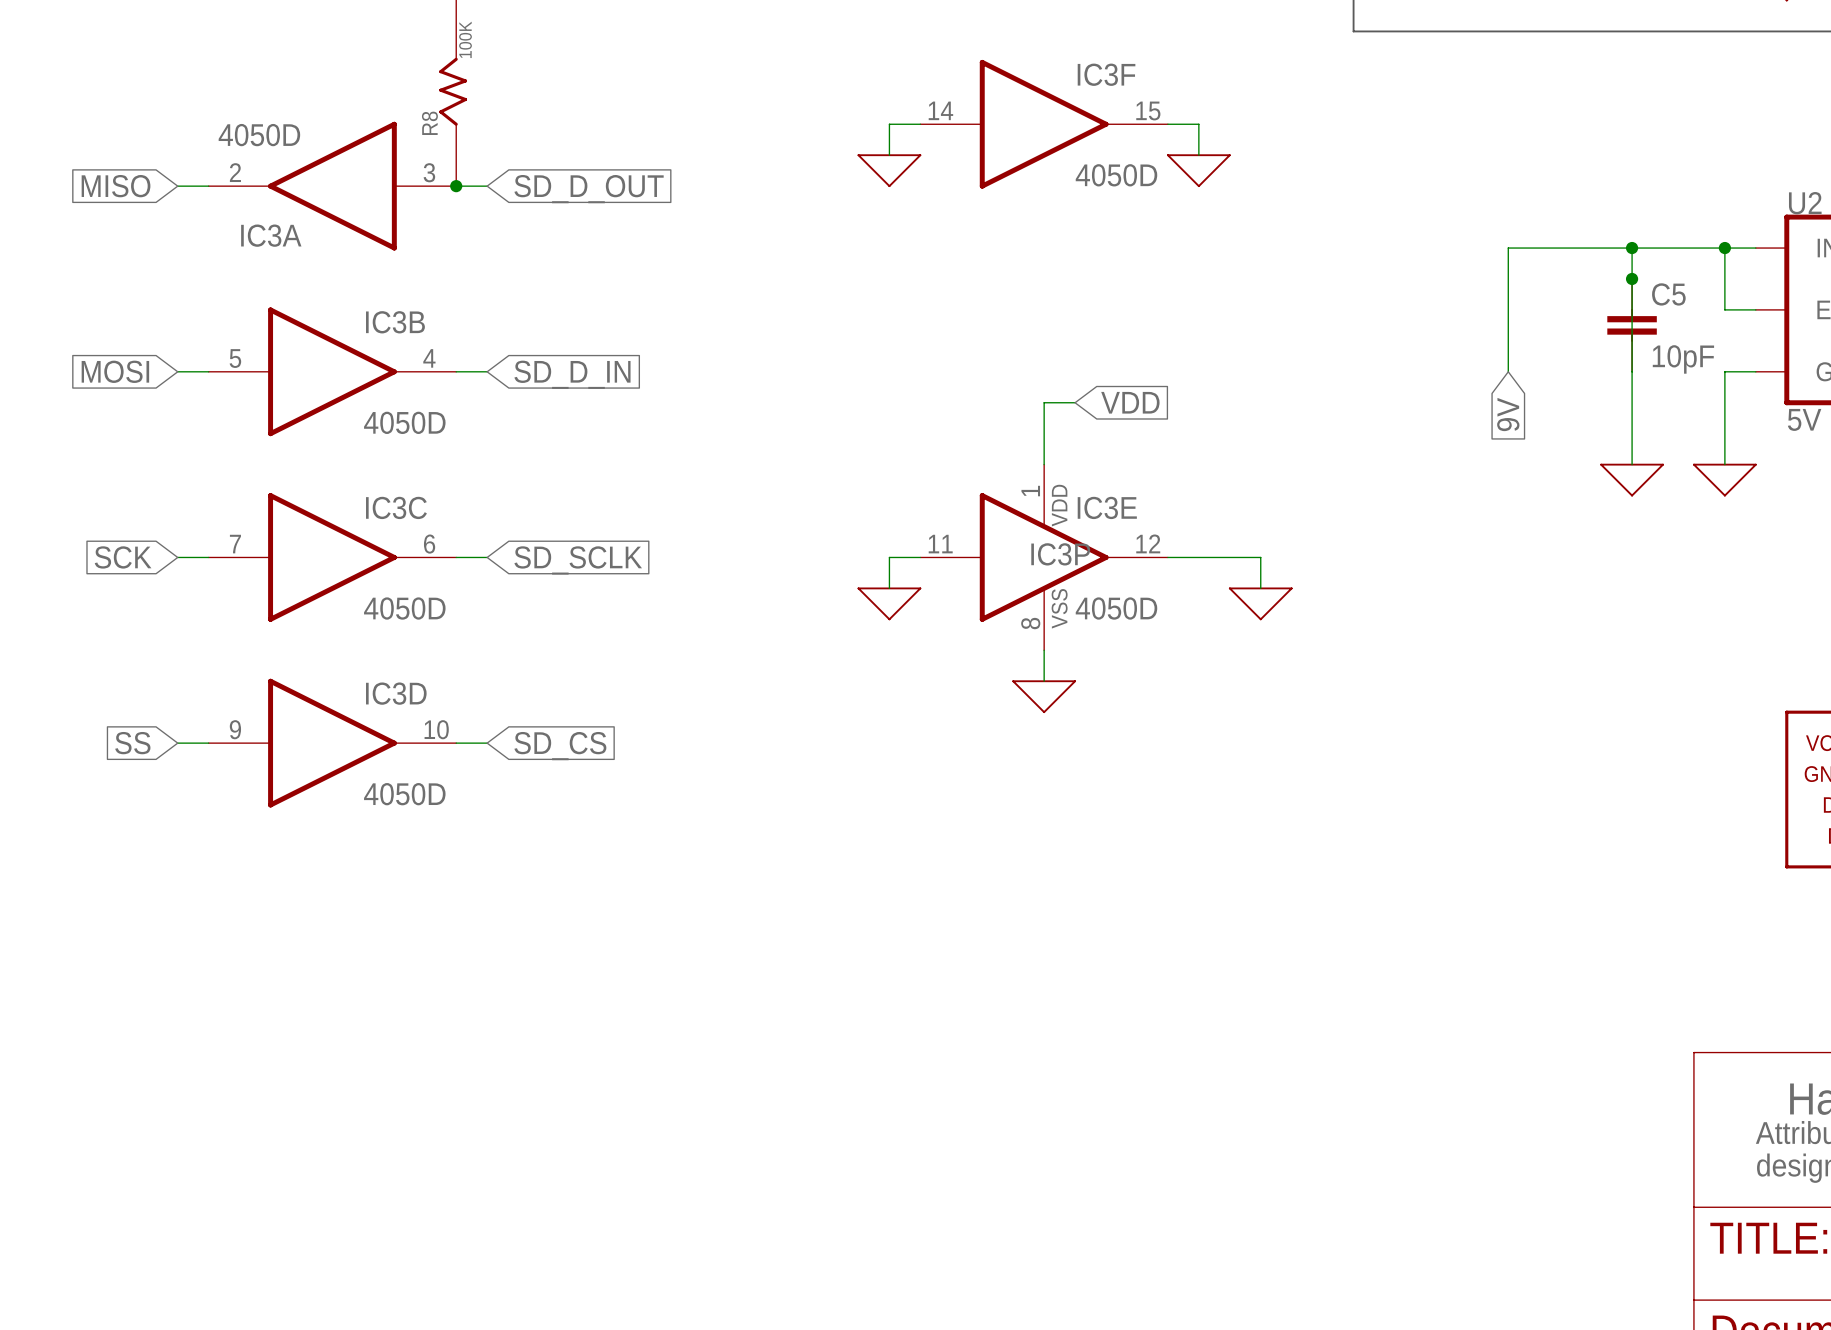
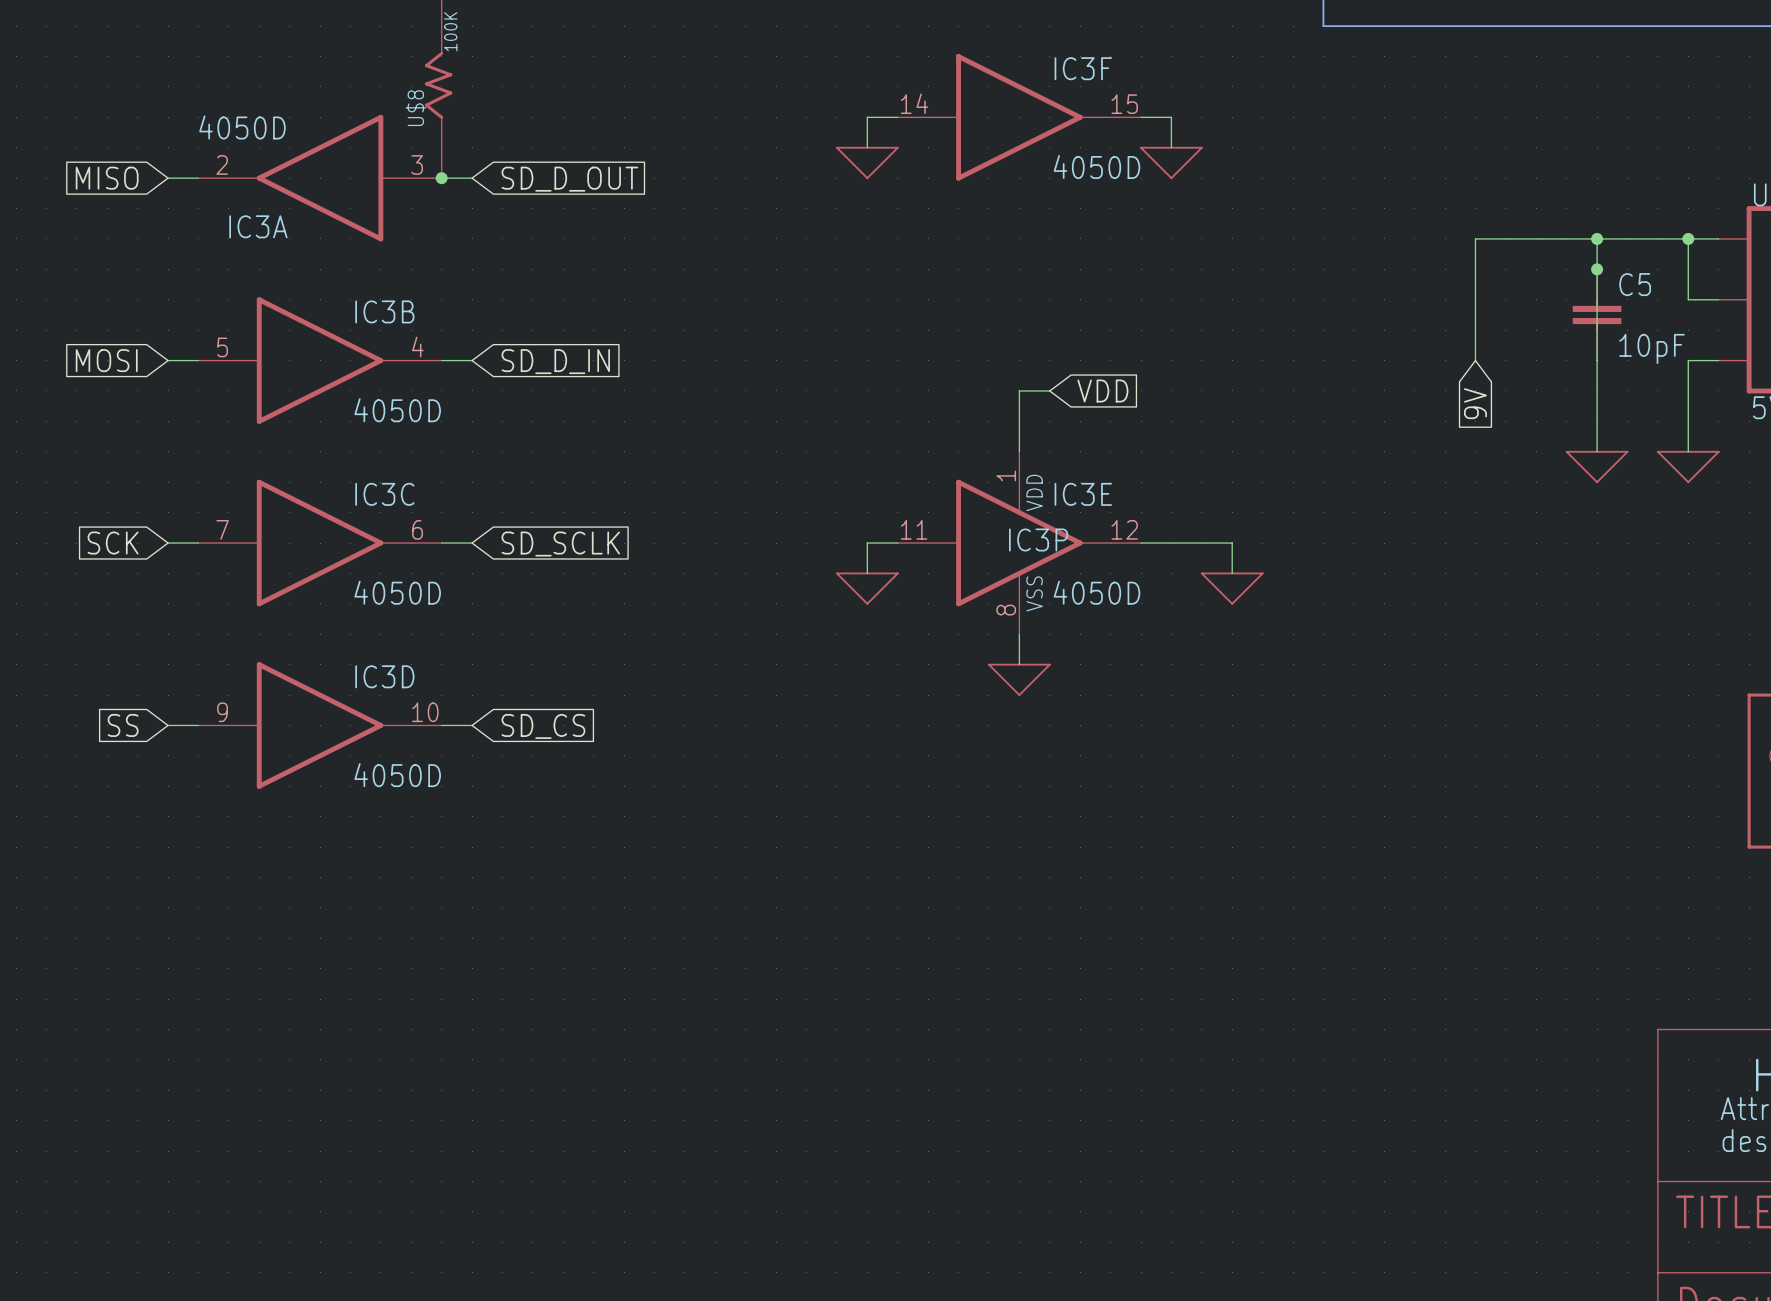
R8 name: R8 (429, 123) -> U$8 (415, 108)

